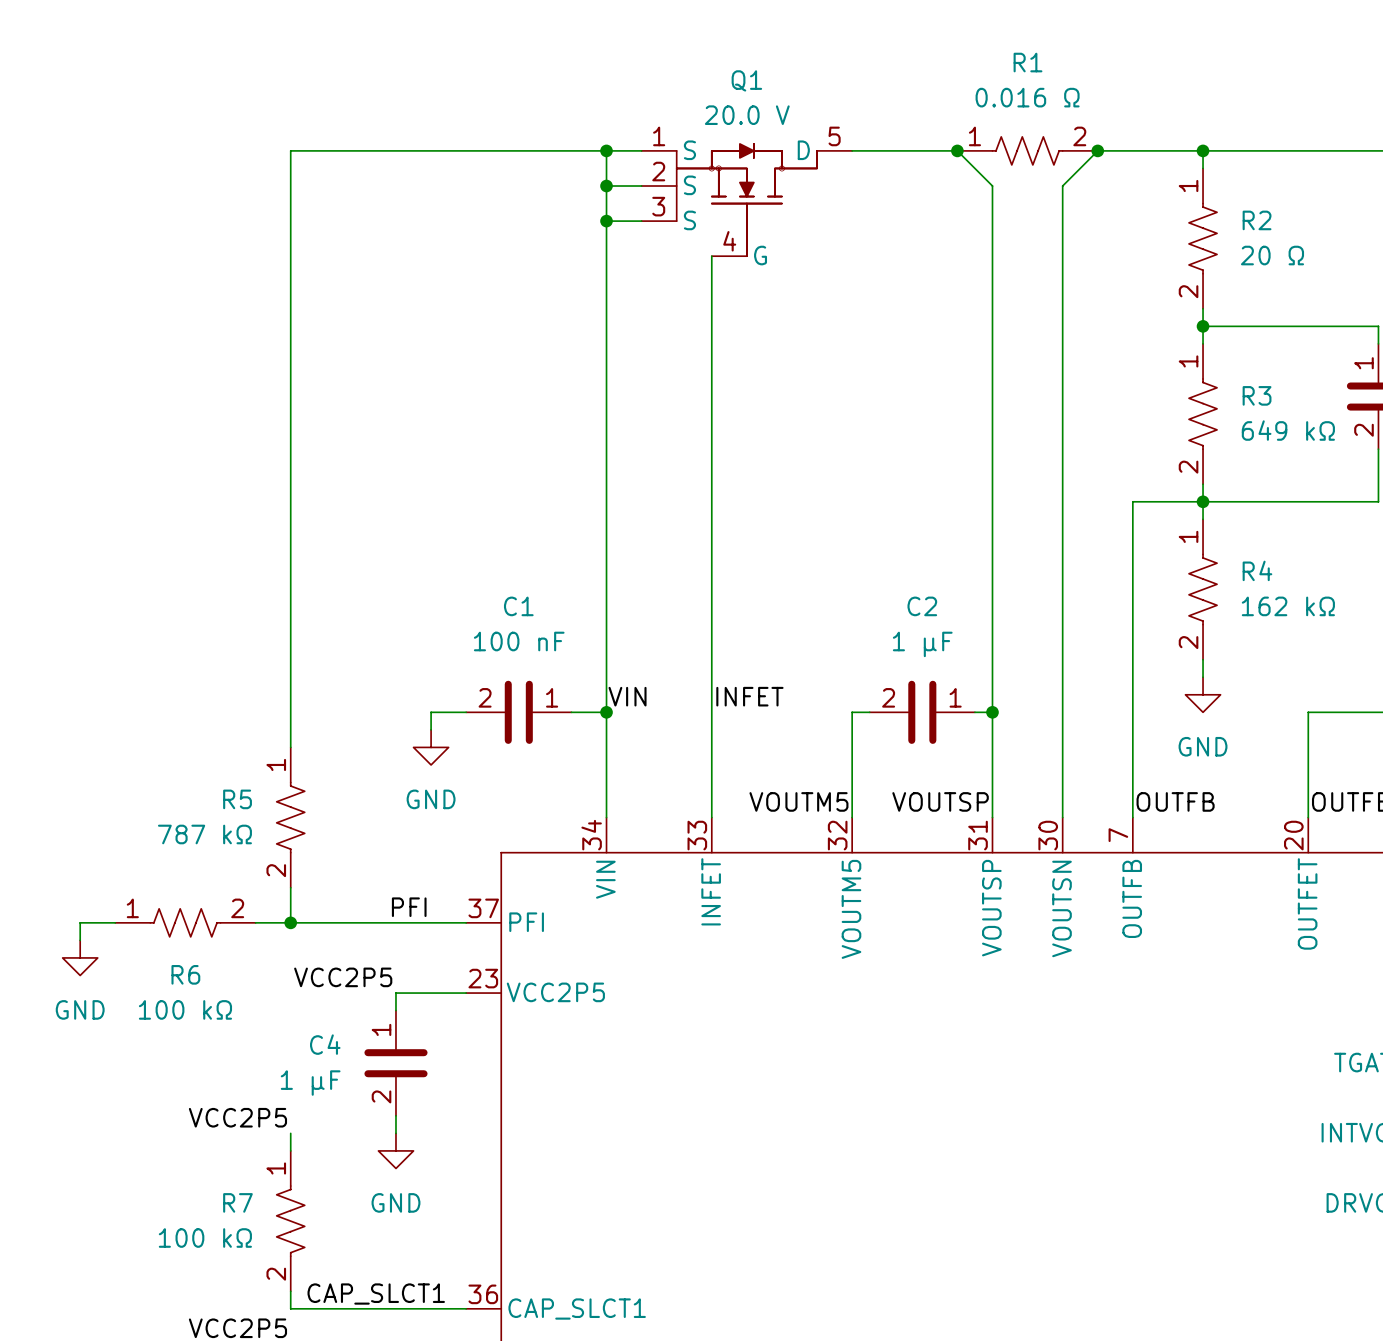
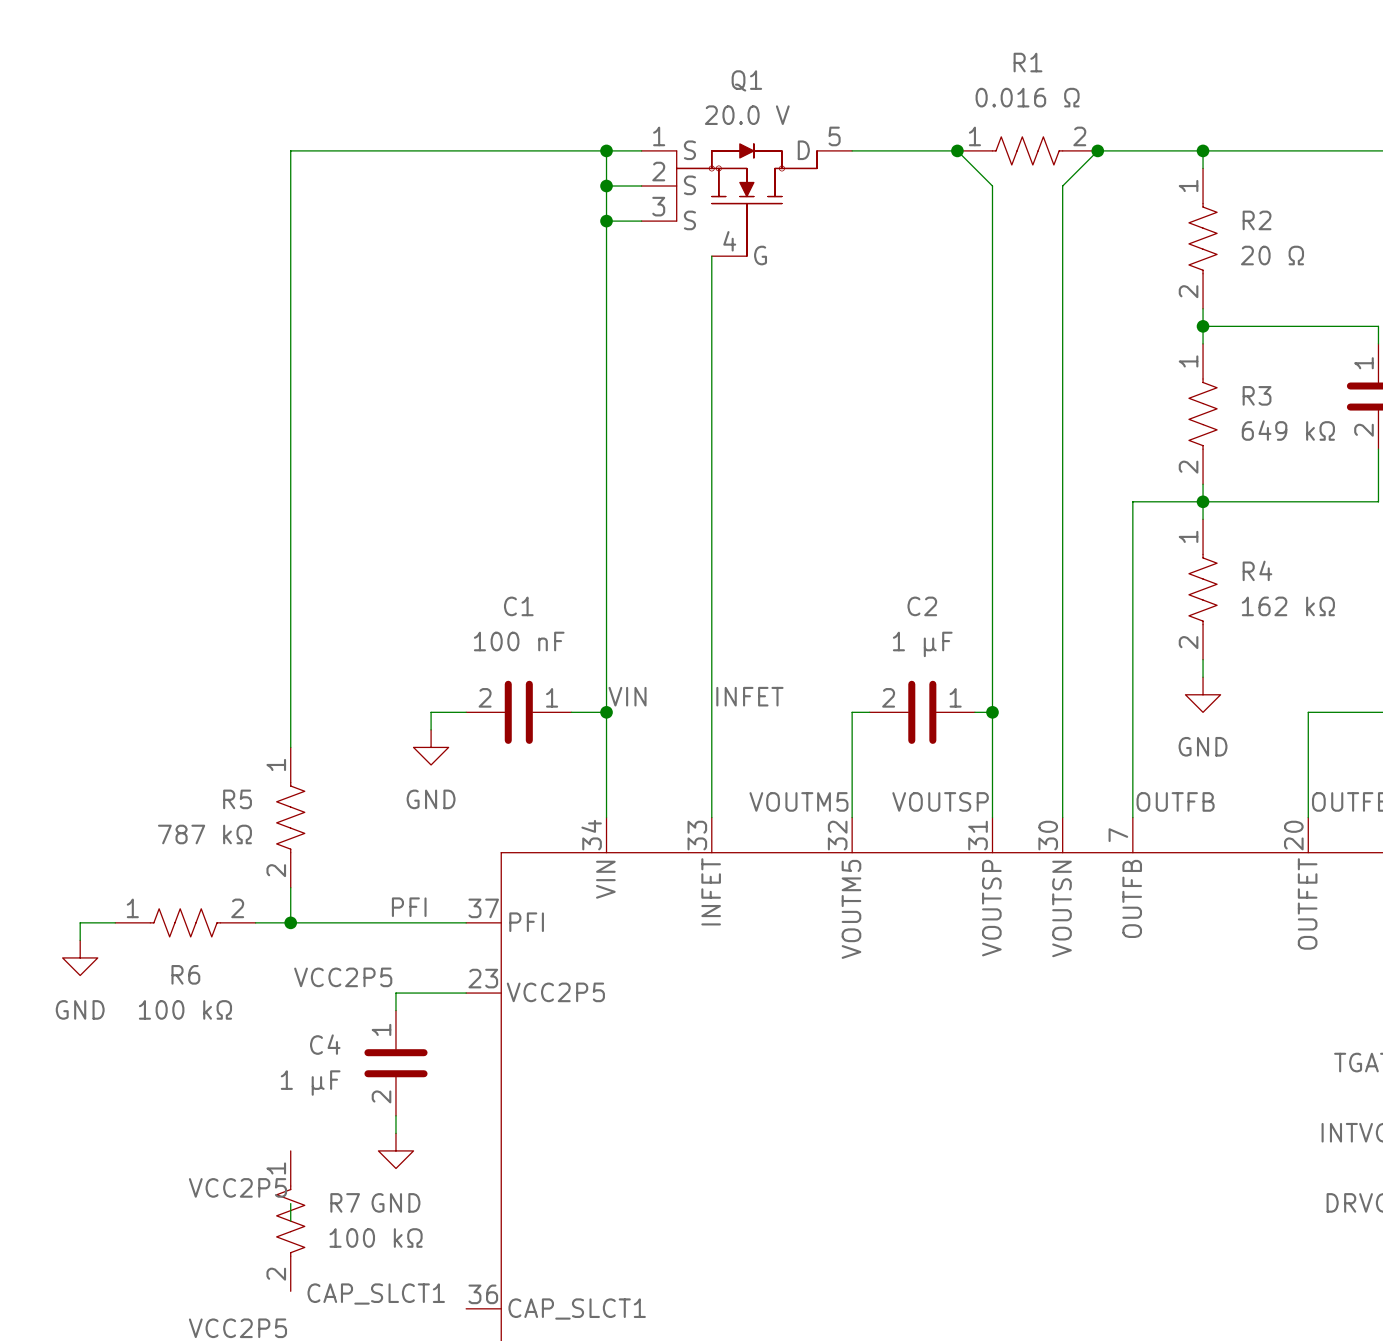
label position: VCC2P5 (237, 1117) -> VCC2P5 (237, 1187)
wire: (290, 1133) (290, 1150) -> (290, 1203) (290, 1221)
R7 name position: R7 (237, 1202) -> R7 (345, 1202)
R7 value position: 100 kΩ (205, 1238) -> 100 kΩ (376, 1238)
wire: (290, 1291) (290, 1308) (466, 1308) -> none

